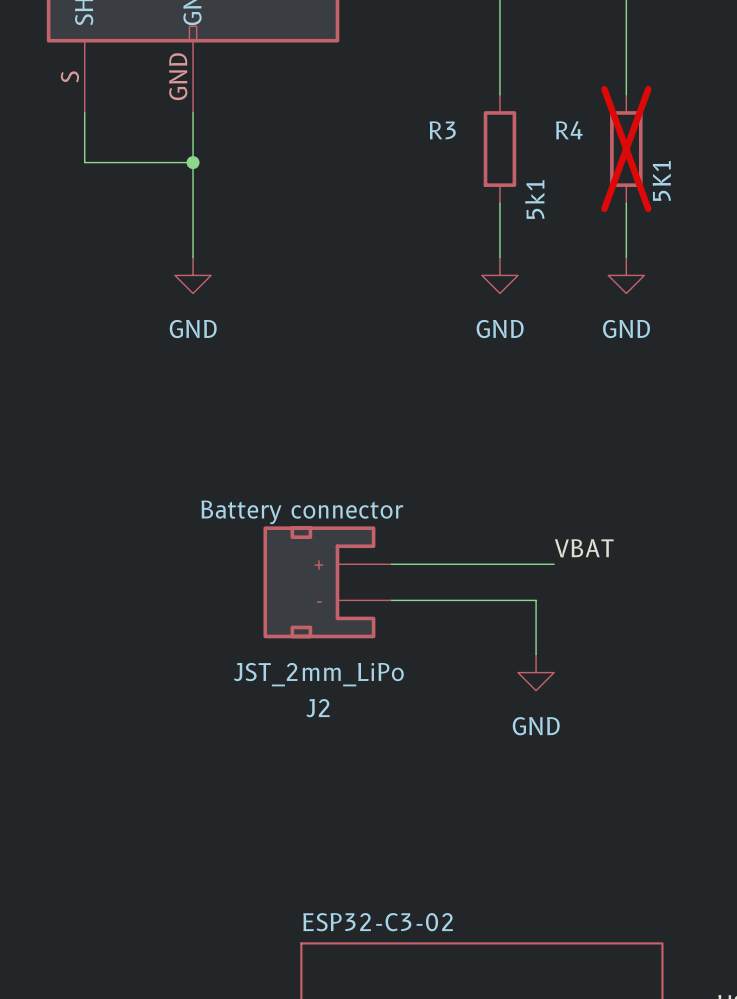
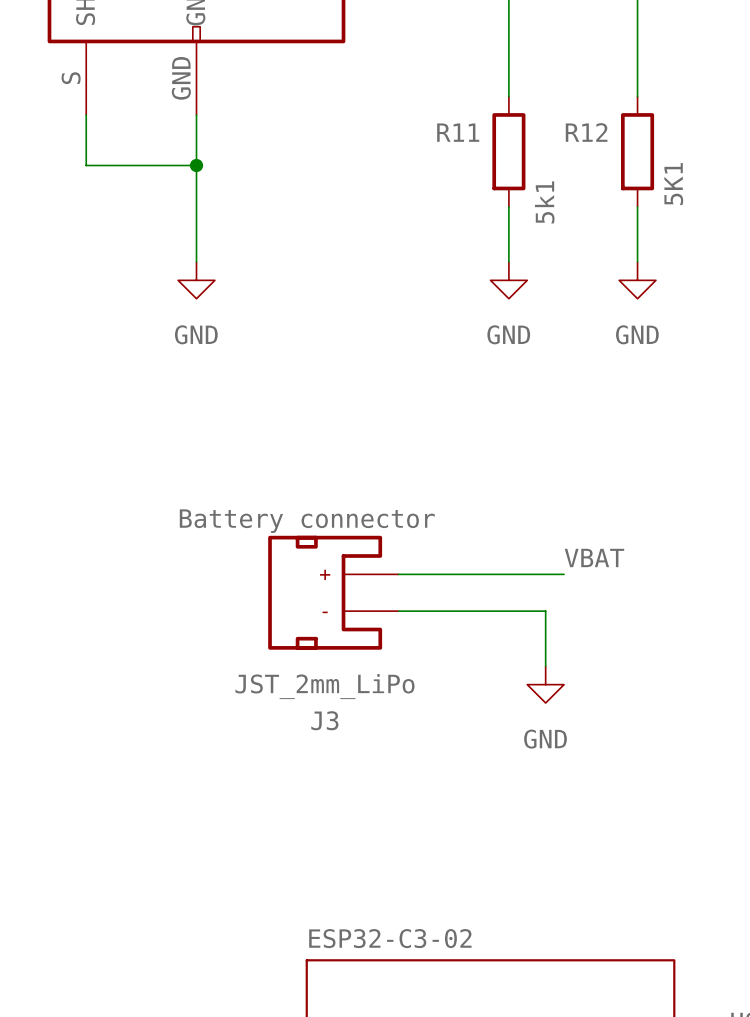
R3 name: R3 (442, 130) -> R11 (458, 132)
R4 name: R4 (569, 130) -> R12 (586, 132)
R4 do-not-place cross: (626, 149) -> none
J2 name: J2 (317, 708) -> J3 (324, 720)

